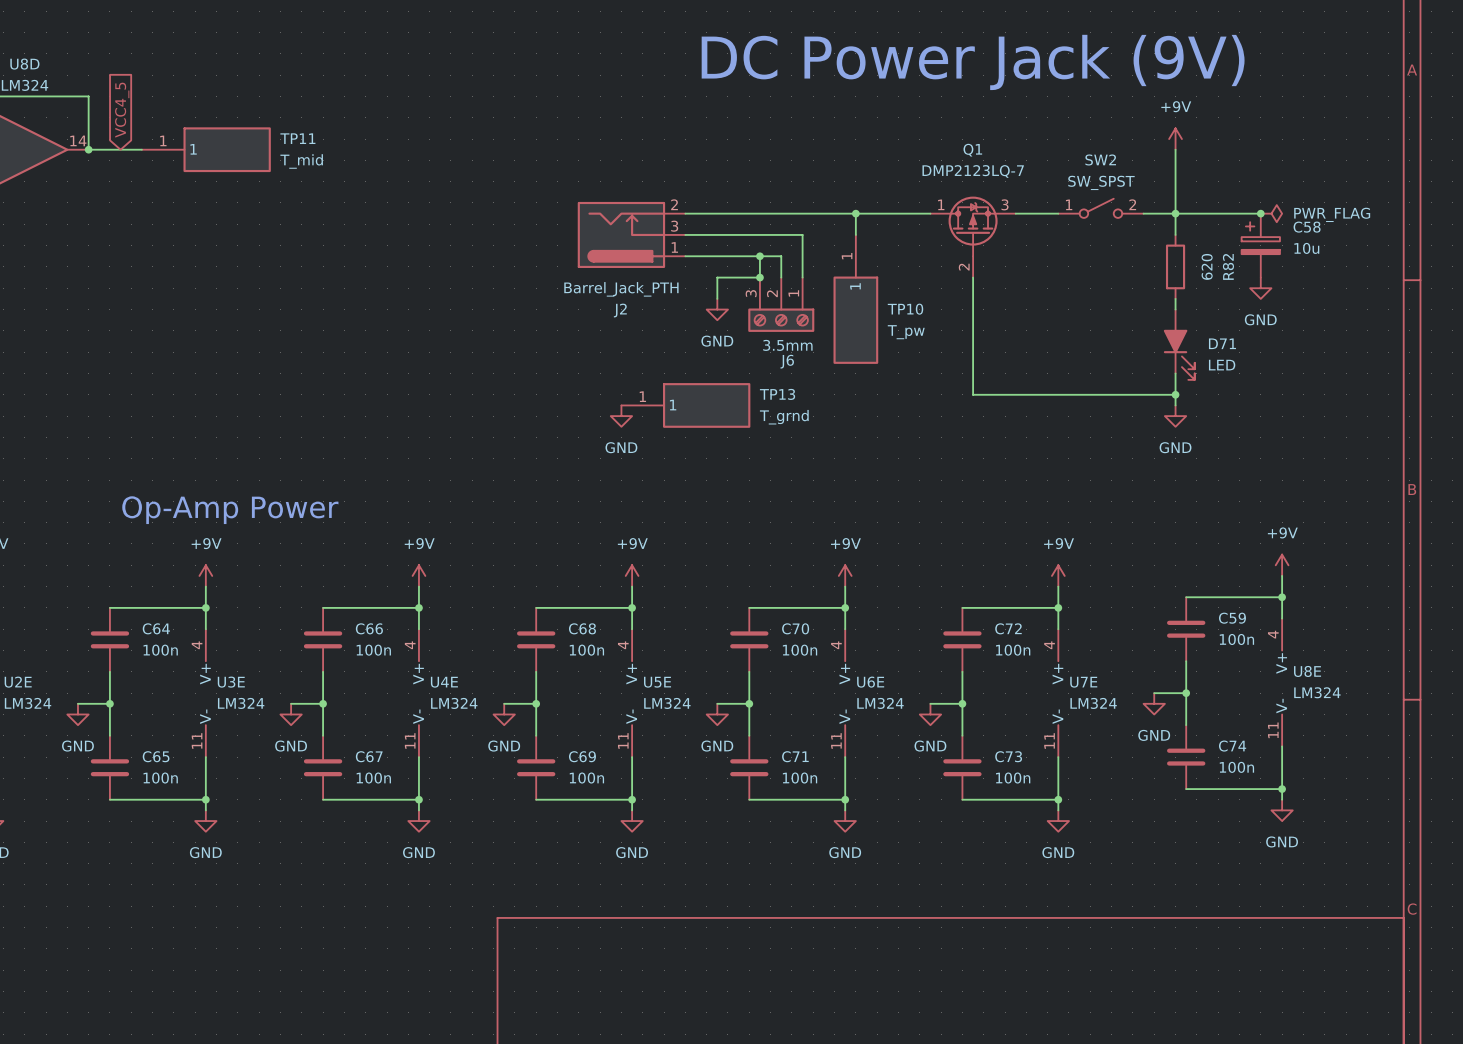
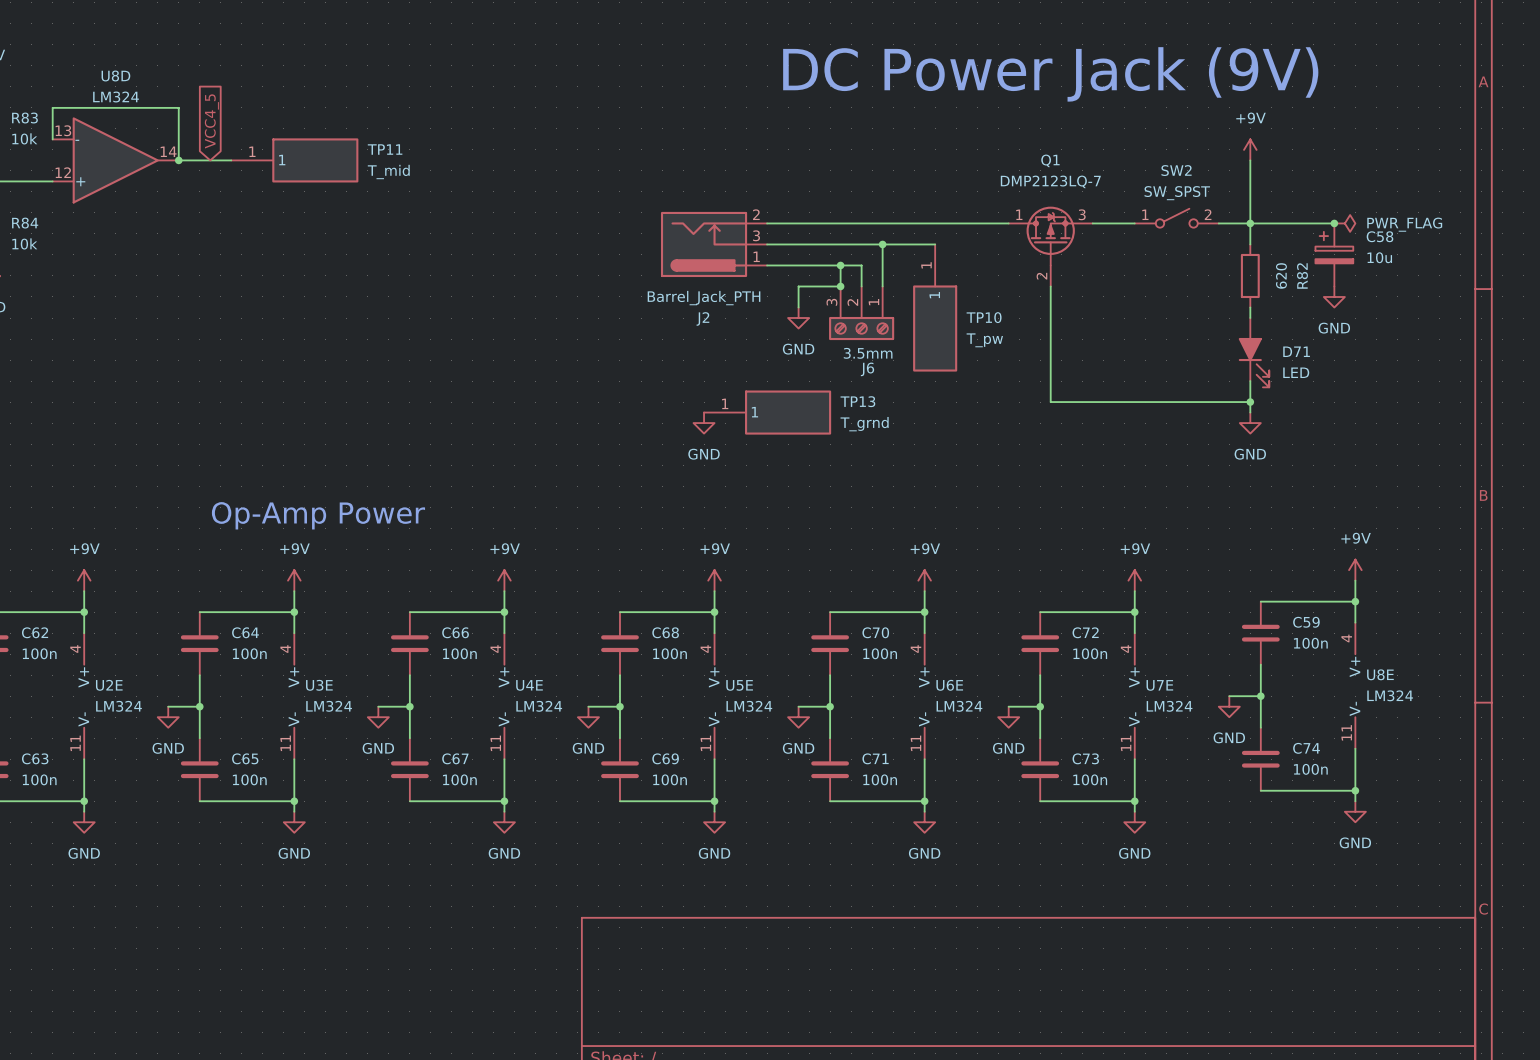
wire: (855, 213) (855, 234) -> (882, 244) (935, 244)
junction: (855, 213) -> none
junction: none -> (882, 244)

